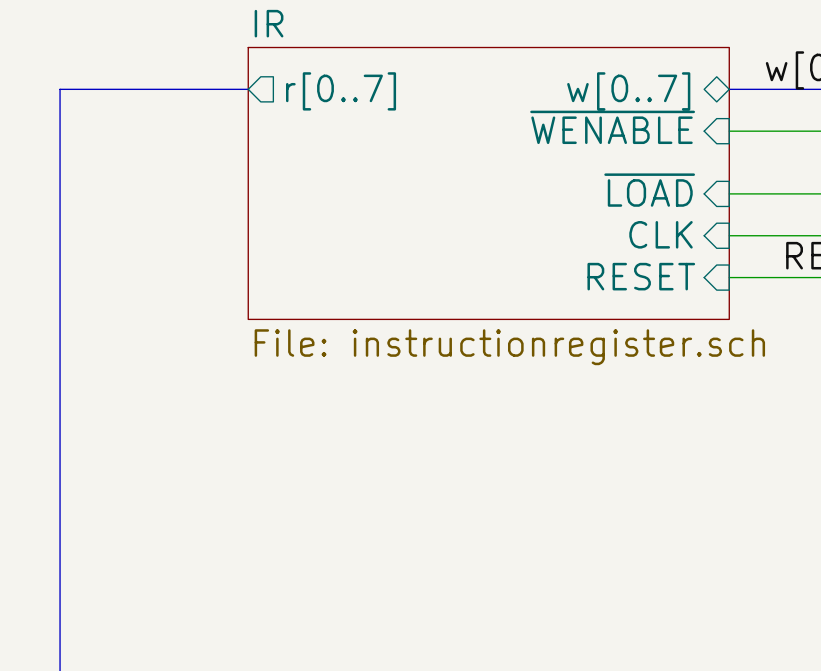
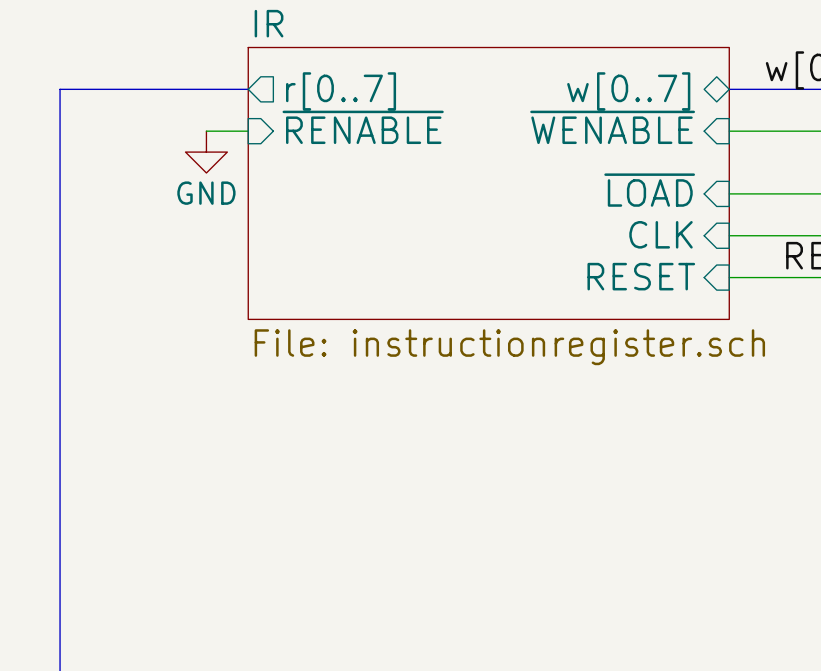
sheet pin: none -> ~{RENABLE} (363, 127)
wire: none -> (206, 131) (248, 131)
power symbol: none -> GND (206, 152)

